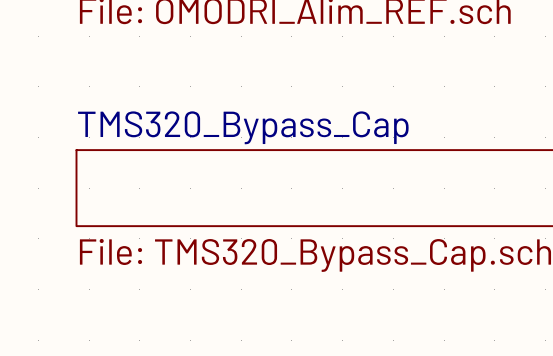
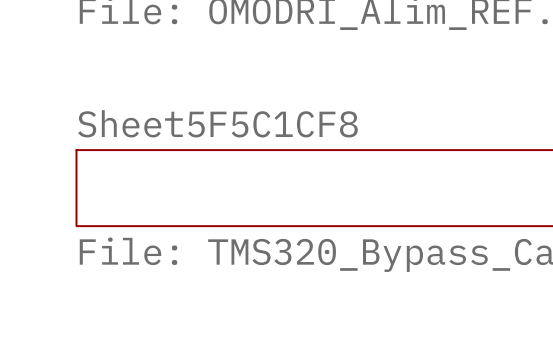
sheet TMS320_Bypass_Cap name: TMS320_Bypass_Cap (243, 127) -> Sheet5F5C1CF8 (217, 123)

